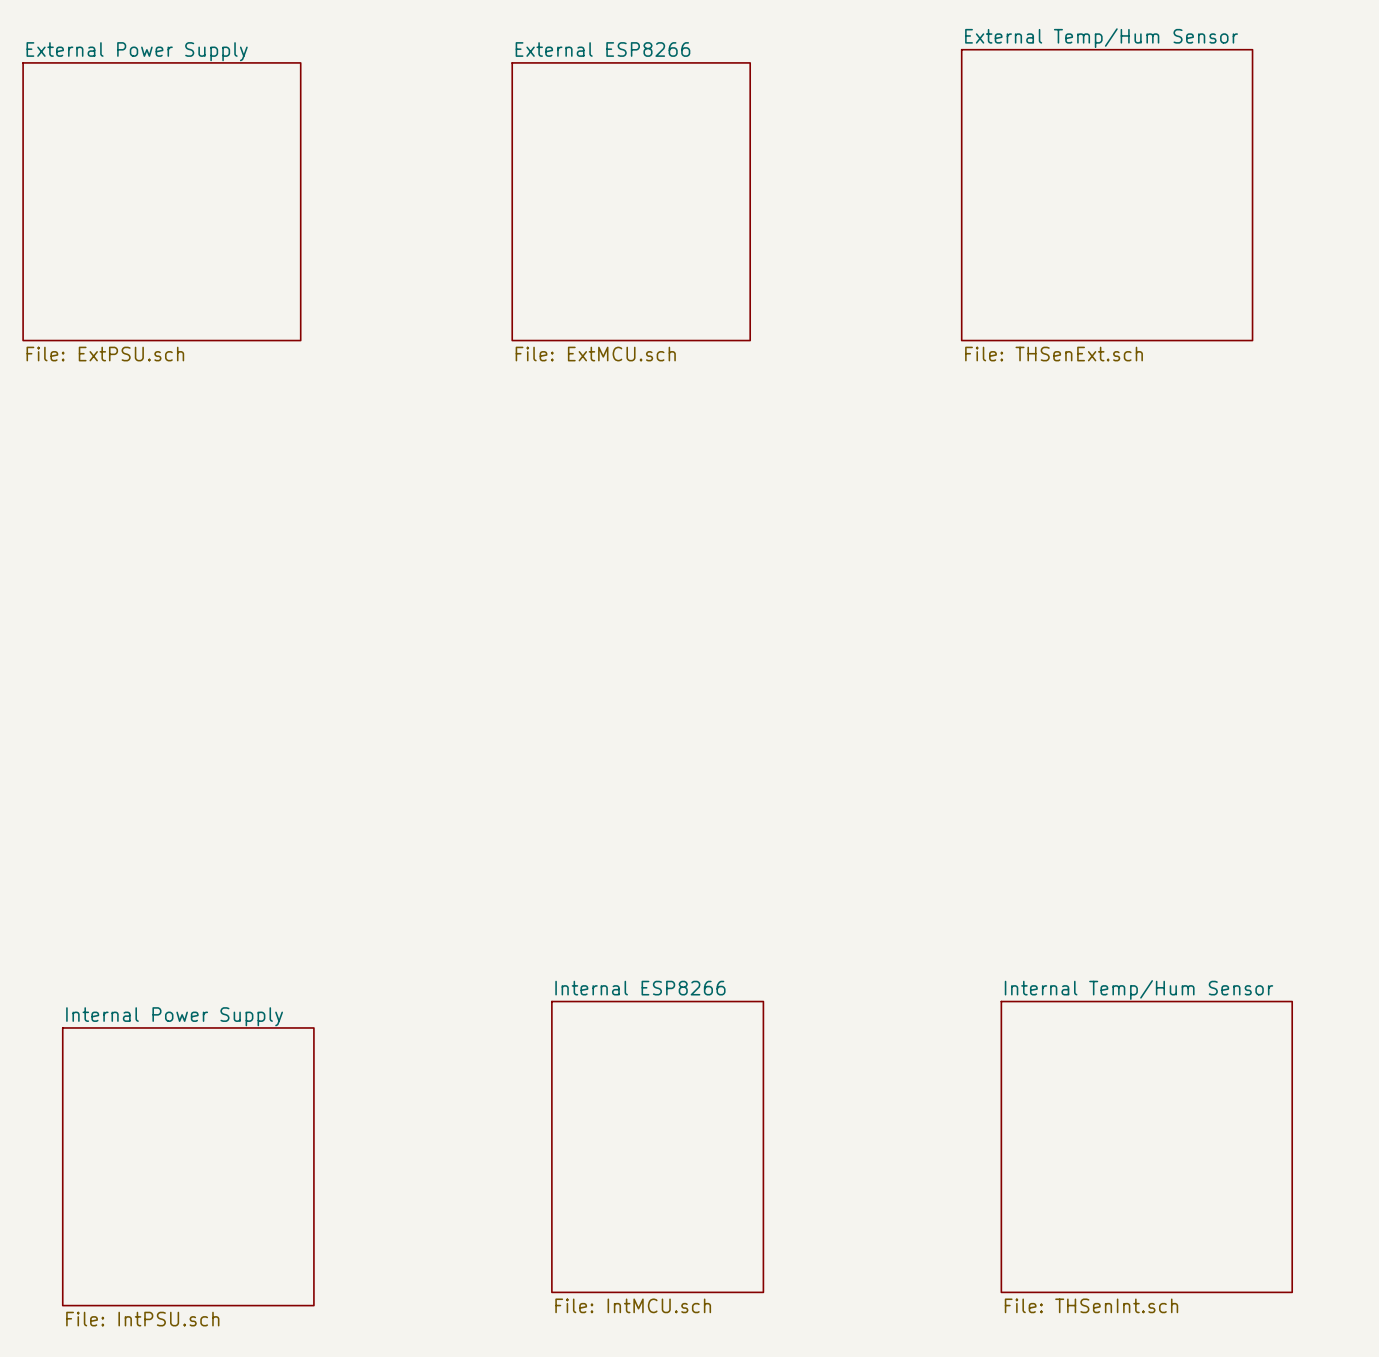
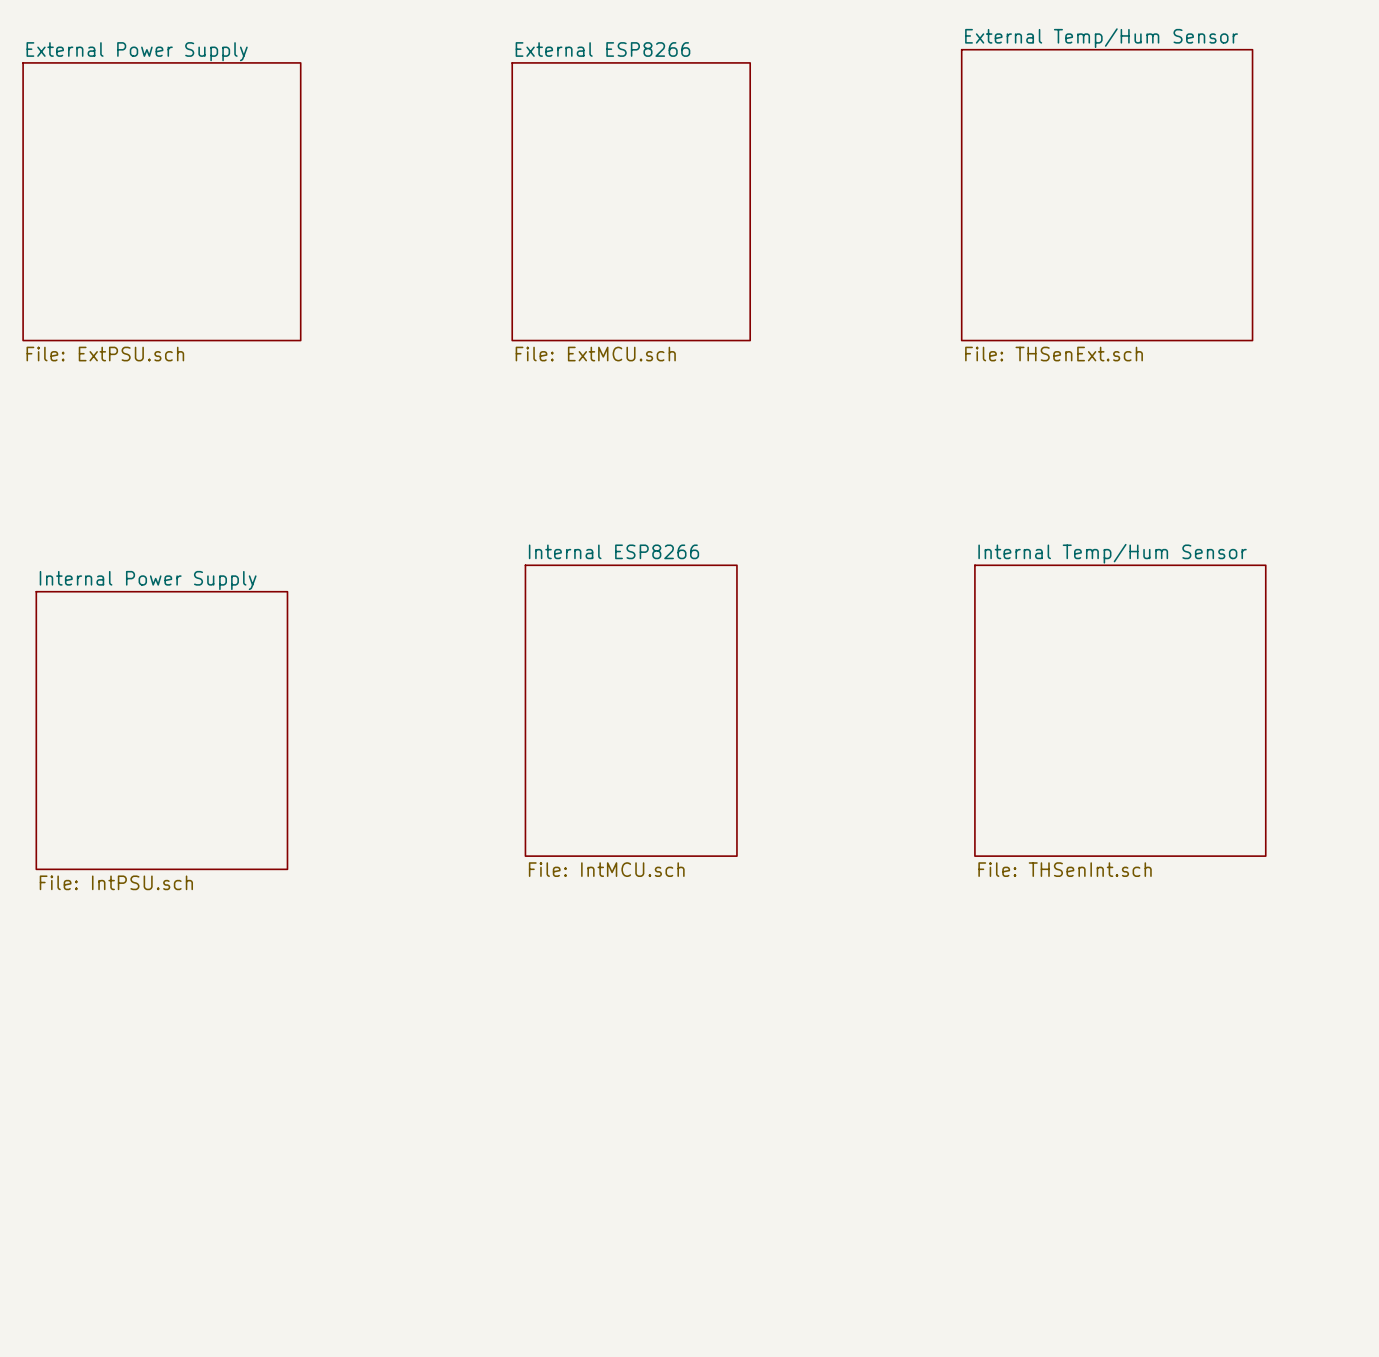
sheet Internal Temp/Hum Sensor: none -> File: THSenInt.sch (1120, 710)
sheet Internal Power Supply: none -> File: IntPSU.sch (161, 730)
sheet Internal ESP8266 position: (657, 1146) -> (631, 710)
sheet Internal Temp/Hum Sensor: File: THSenInt.sch (1146, 1146) -> none
sheet Internal Power Supply: File: IntPSU.sch (188, 1166) -> none

